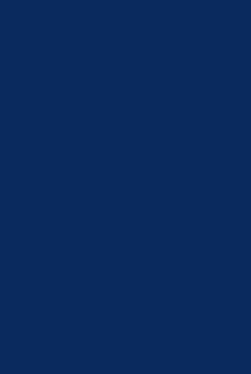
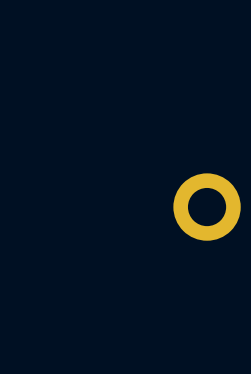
part: none -> (207, 207)

